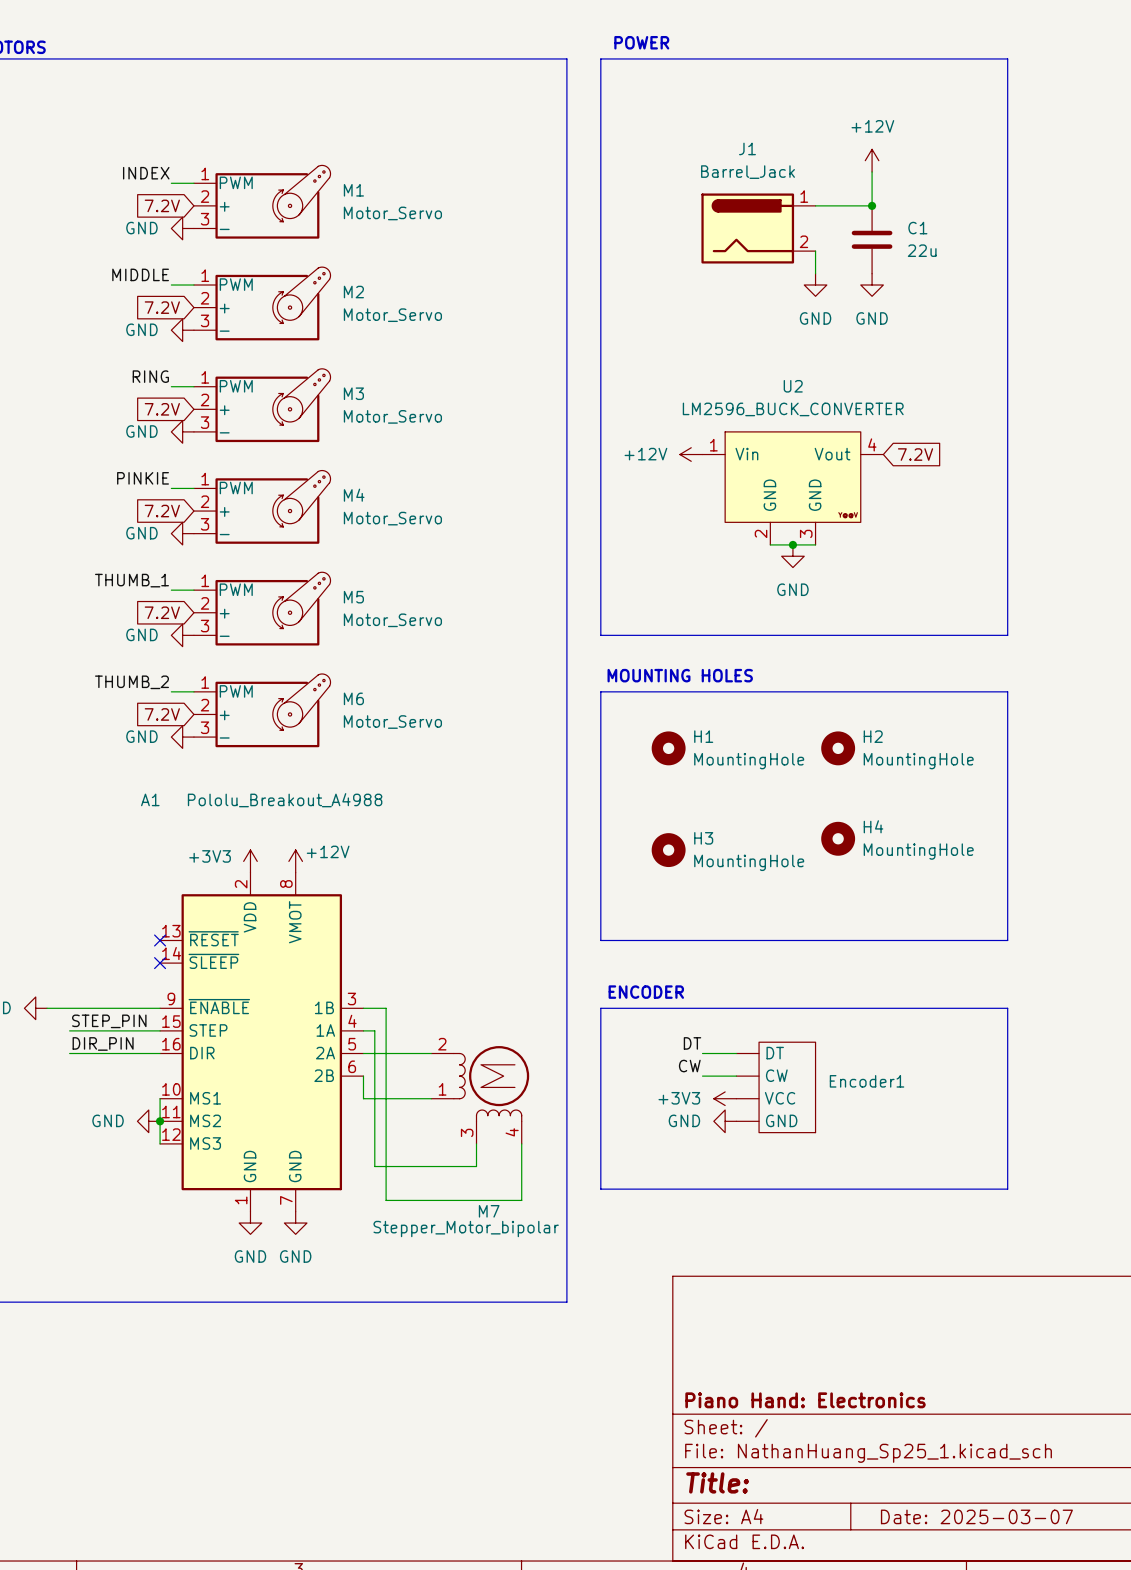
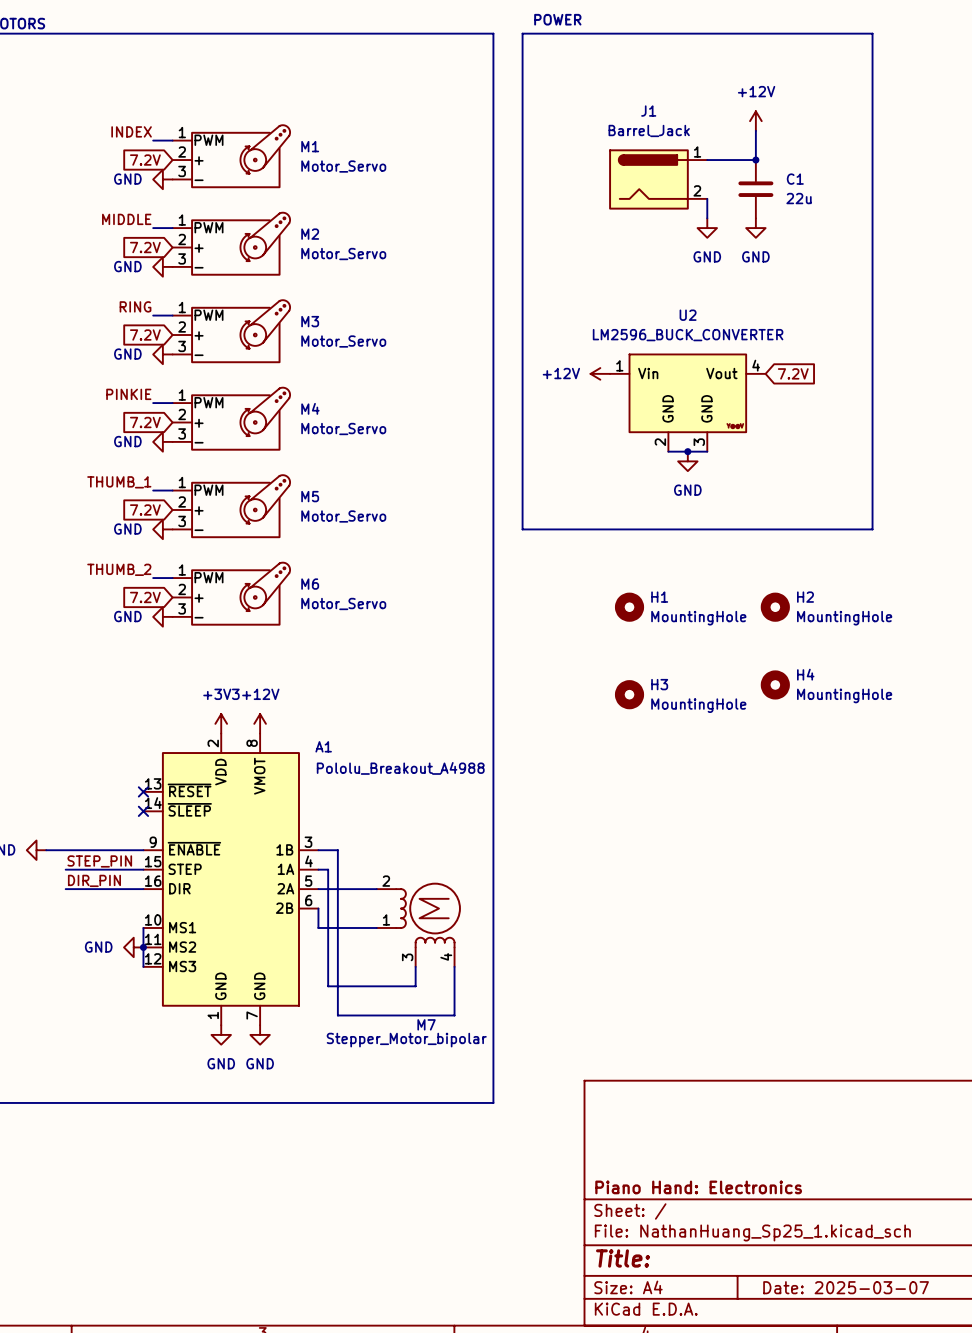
text: MOUNTING HOLES (680, 675) -> none
line: (600, 691) (1007, 691) (1007, 940) (600, 940) (600, 691) -> none
H1 position: (668, 748) -> (629, 607)
H2 position: (838, 748) -> (775, 607)
A1 name position: A1 (150, 799) -> A1 (323, 746)
A1 value position: Pololu_Breakout_A4988 (285, 800) -> Pololu_Breakout_A4988 (400, 768)
H4 position: (838, 838) -> (775, 684)
H3 position: (668, 850) -> (629, 694)
power symbol text position: +12V (328, 851) -> +12V (260, 694)
power symbol text position: +3V3 (210, 856) -> +3V3 (221, 694)
text: ENCODER (646, 992) -> none
line: (600, 1008) (600, 1189) (1007, 1189) (1007, 1008) (600, 1008) -> none
label: DT (692, 1043) -> none
wire: (702, 1053) (736, 1053) -> none
label: CW (689, 1066) -> none
wire: (702, 1076) (736, 1076) -> none
Encoder1: (775, 1087) -> none
power symbol: +3V3 (725, 1098) -> none
power symbol: GND (725, 1121) -> none

